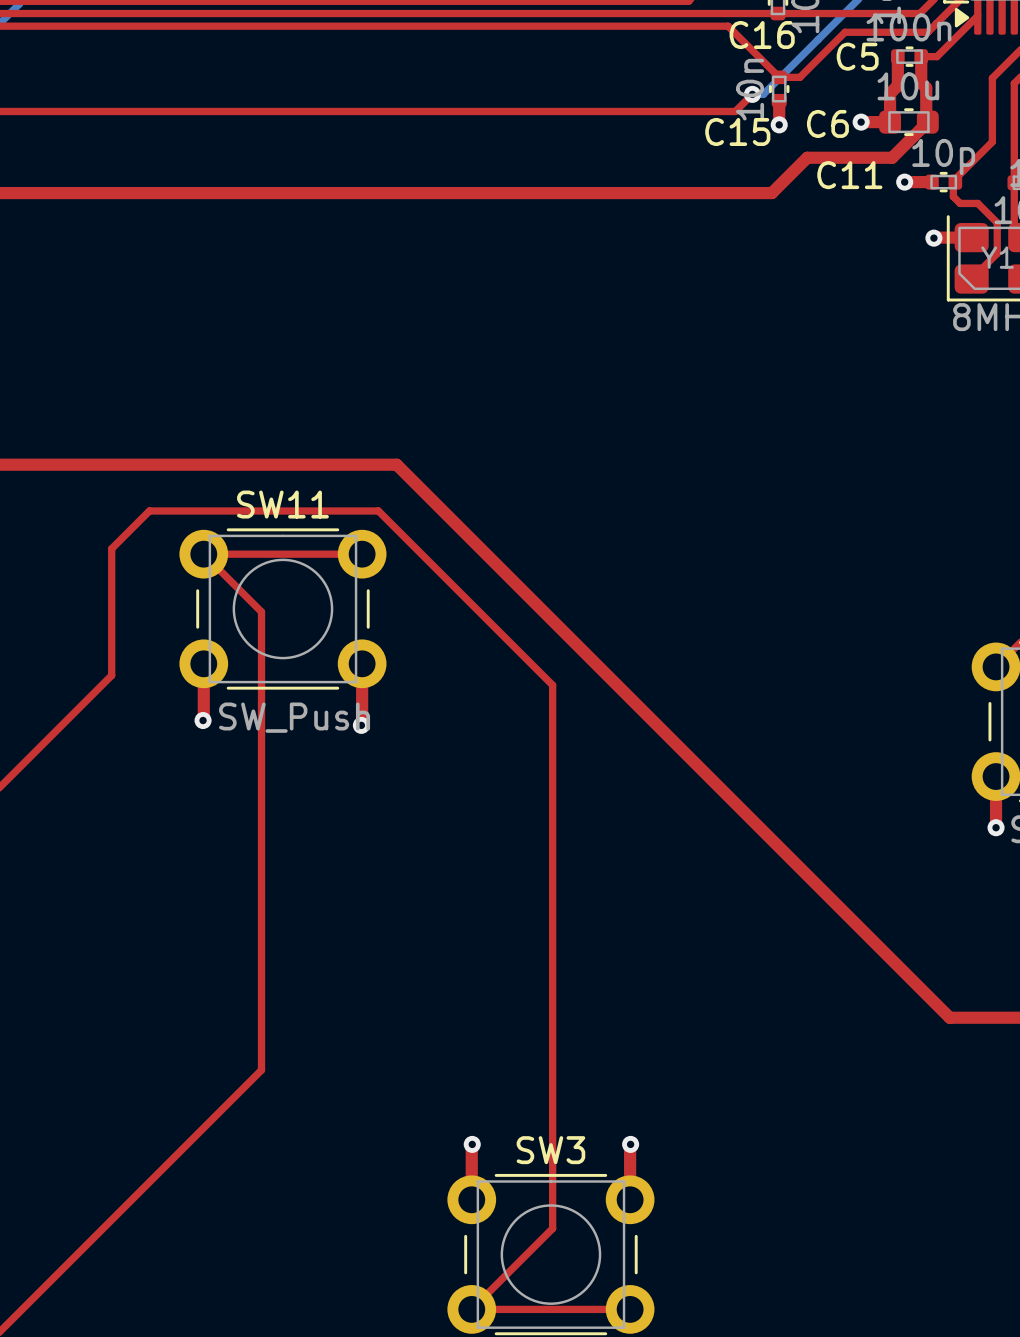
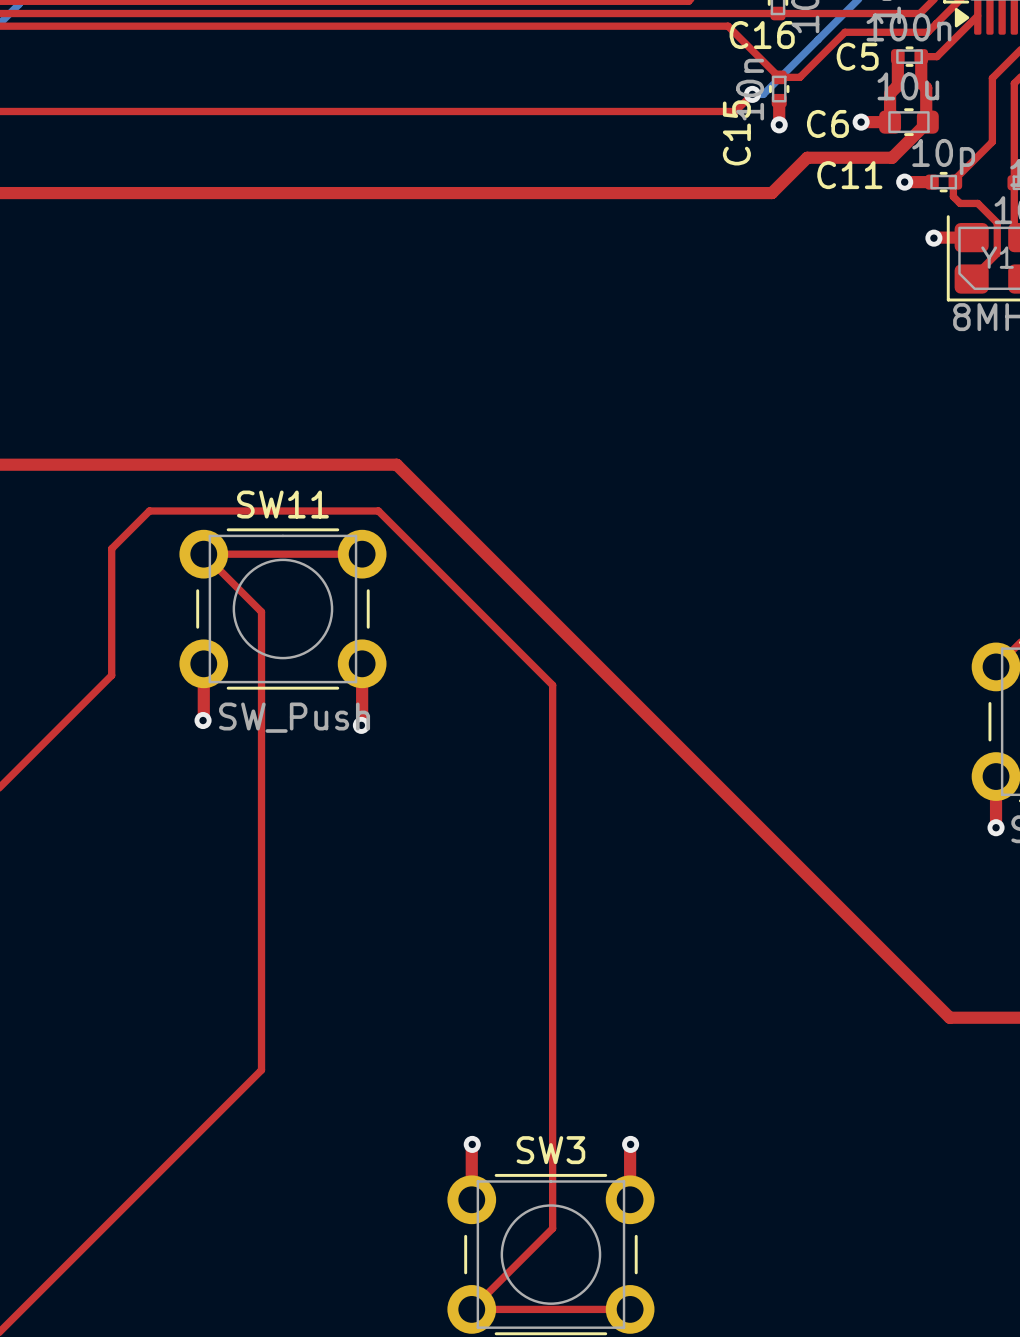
C15 name rotation: 0° (737, 131) -> 90° counterclockwise (736, 132)

